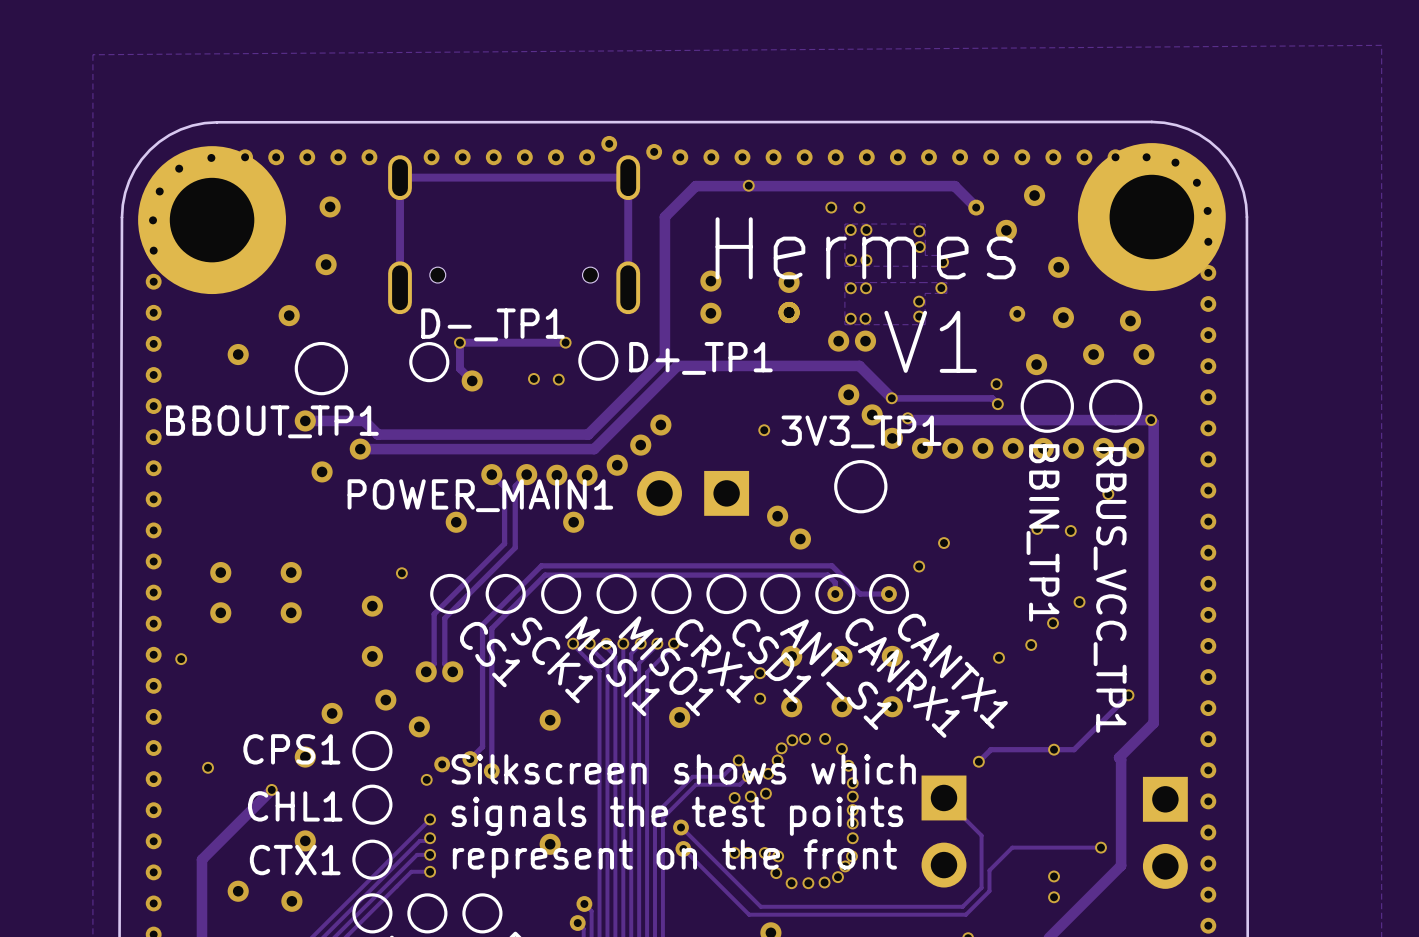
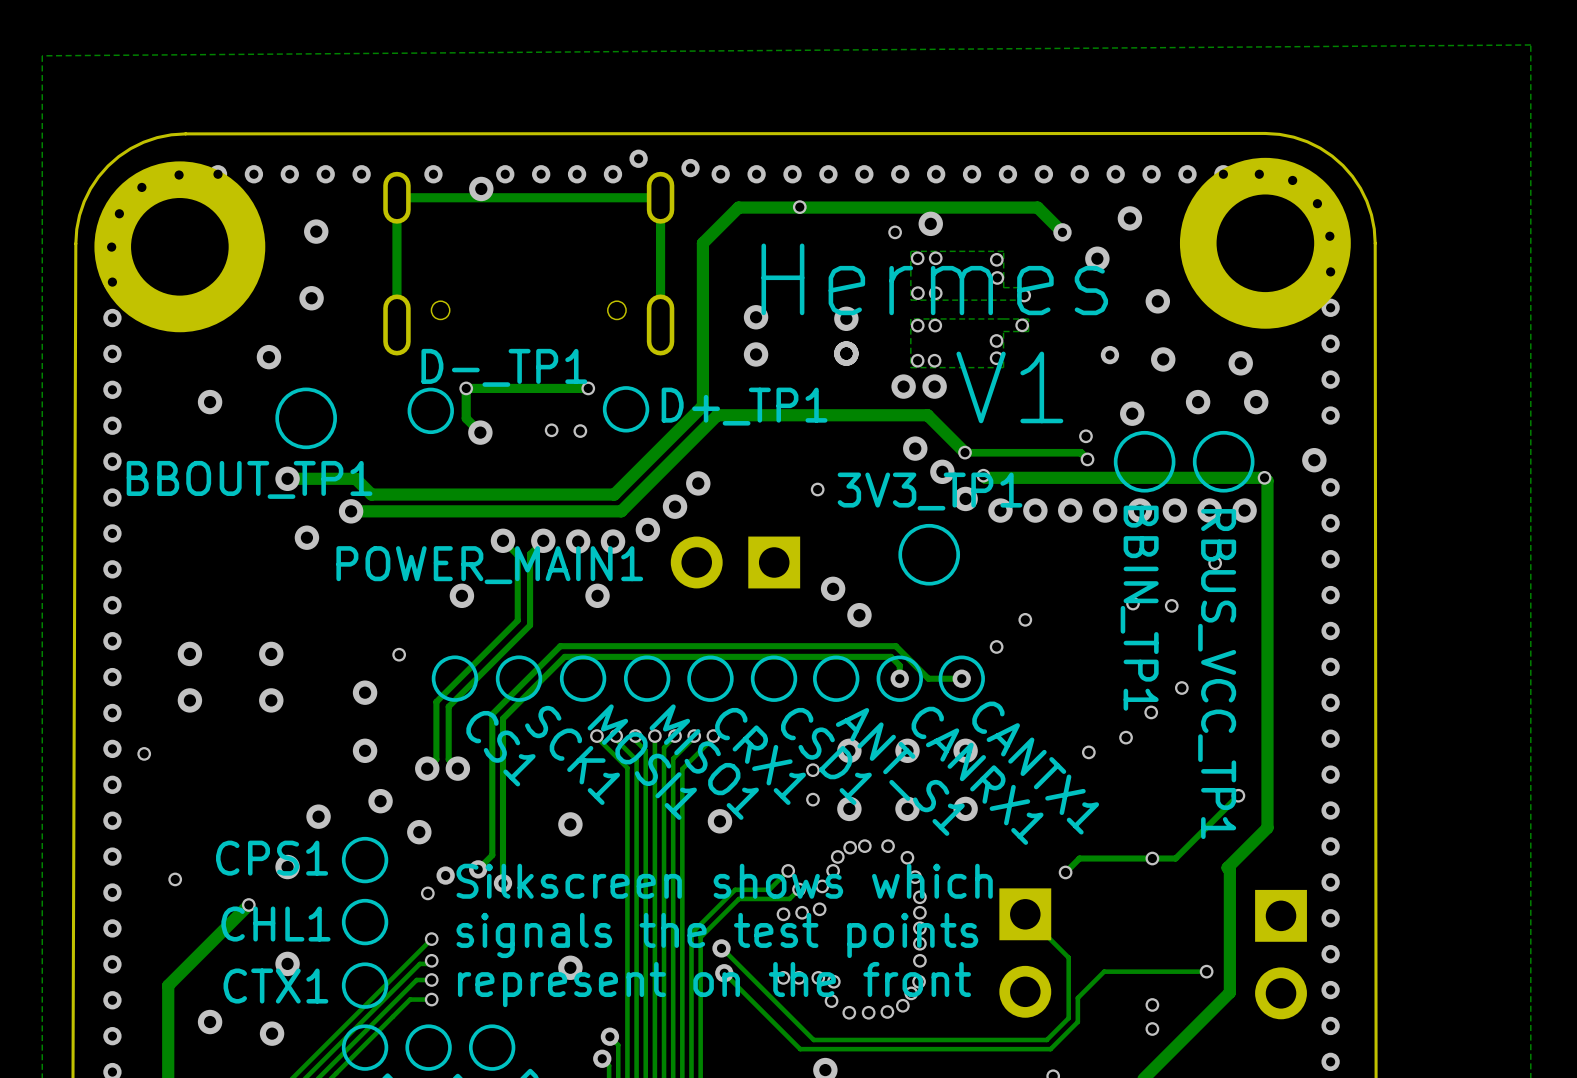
via position: (462, 157) -> (481, 188)
via size: [853, 201, 866, 214] -> [918, 211, 943, 237]
via position: (1208, 397) -> (1314, 460)

